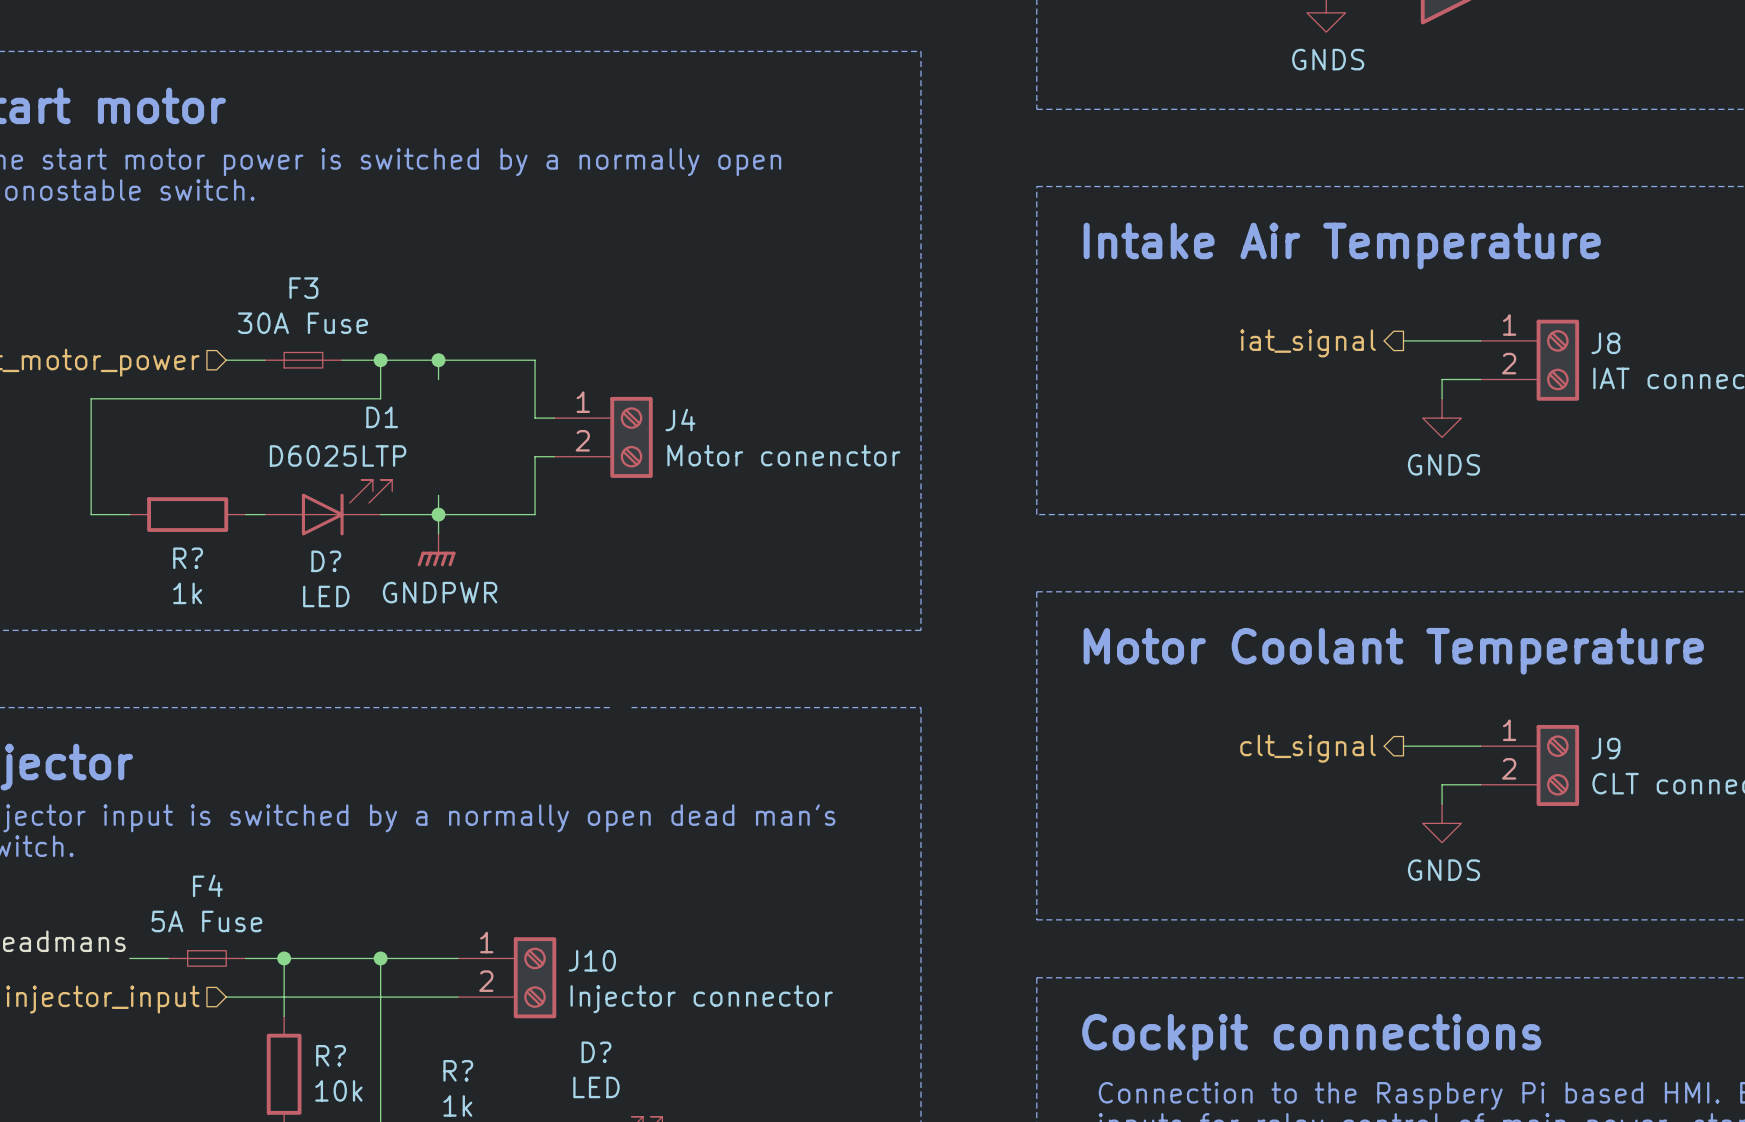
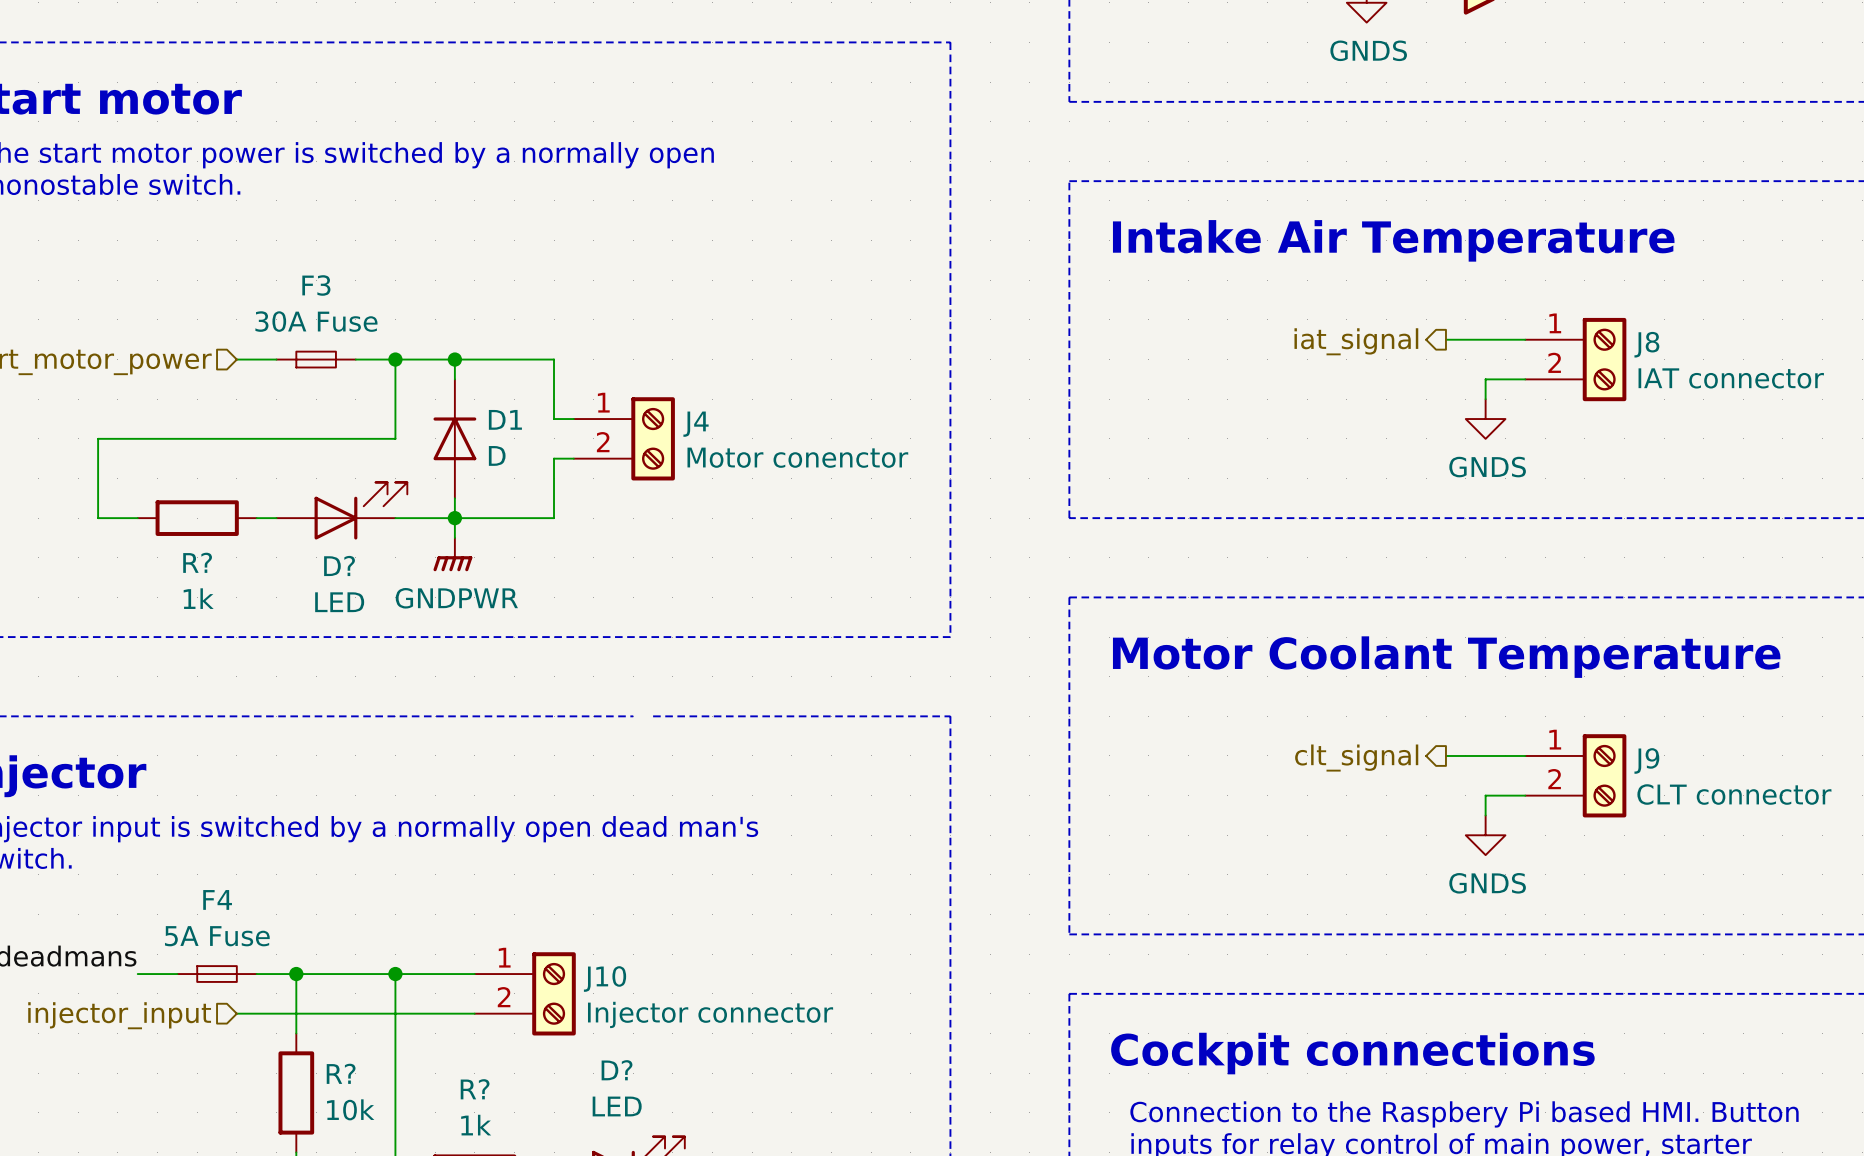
wire: (380, 398) (91, 398) (91, 437) -> (395, 399) (395, 438) (98, 438)
D1 symbol: [269, 406, 407, 467] -> [433, 379, 477, 499]
D1 value: D6025LTP (338, 455) -> D (497, 455)

